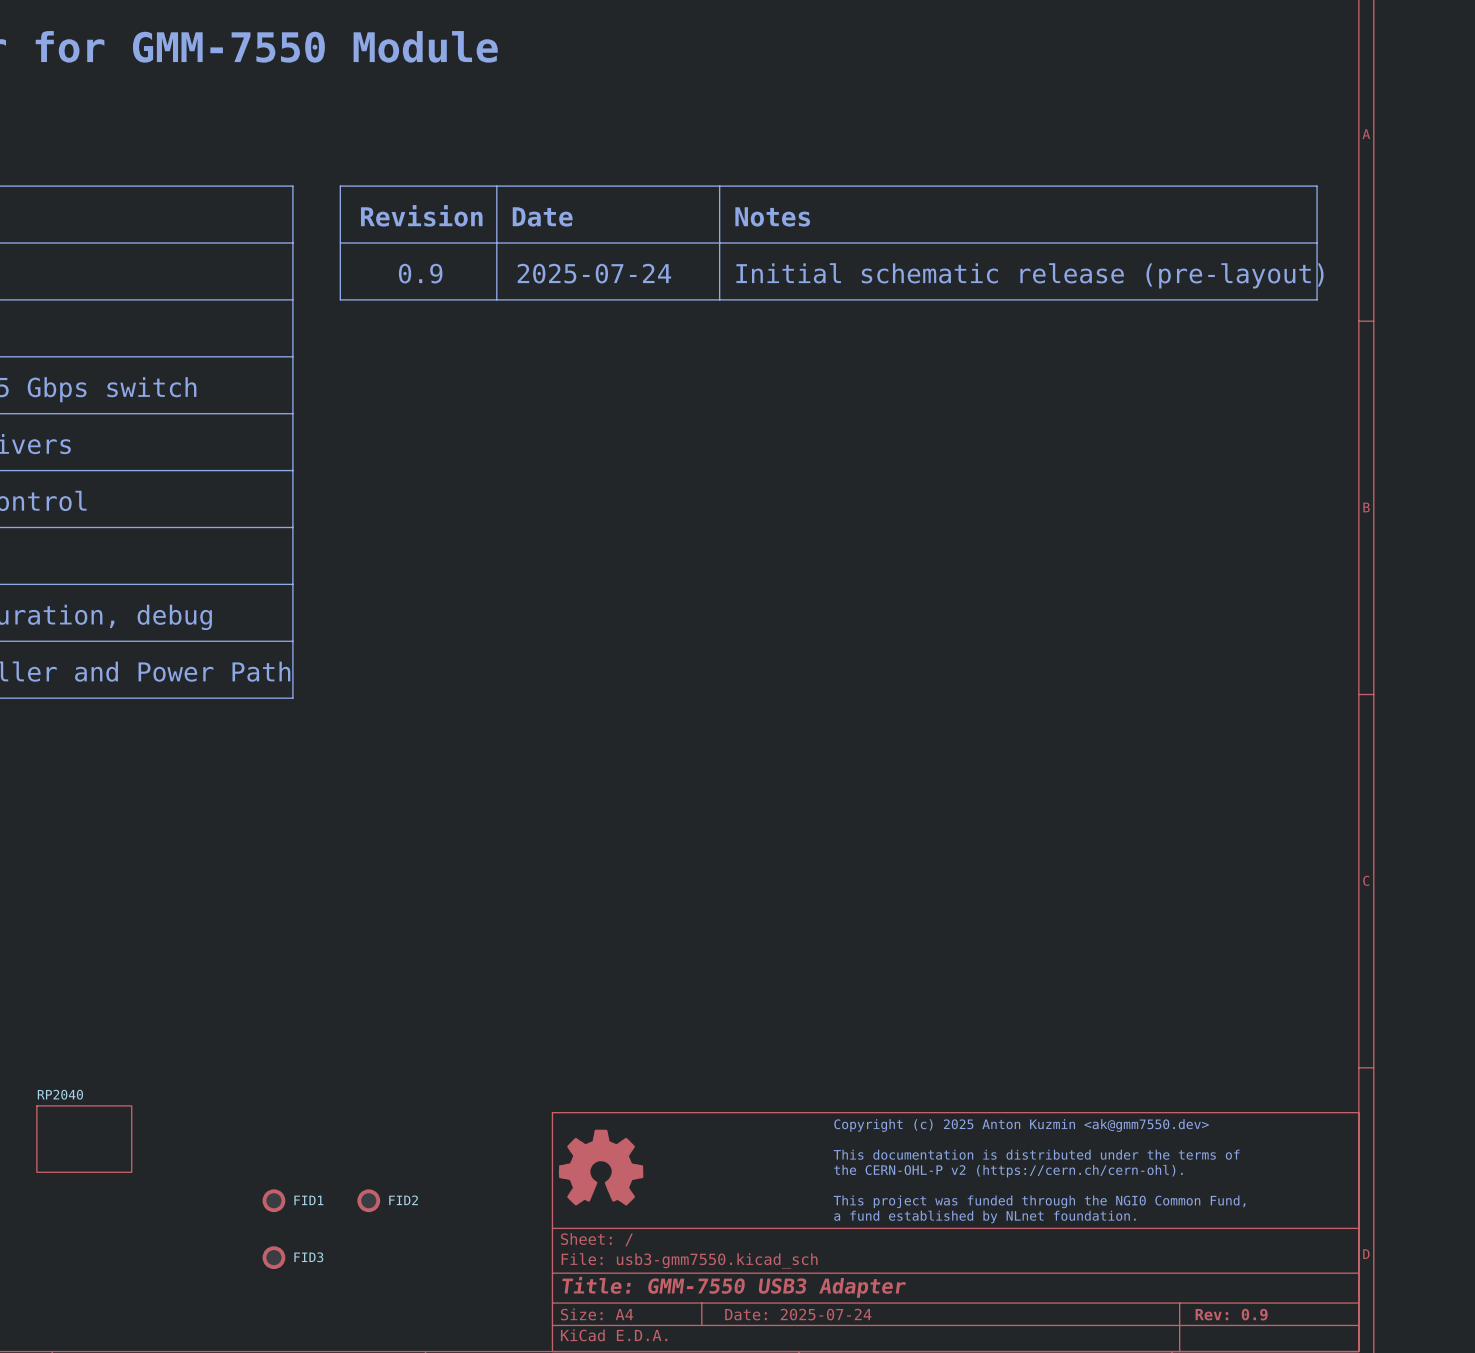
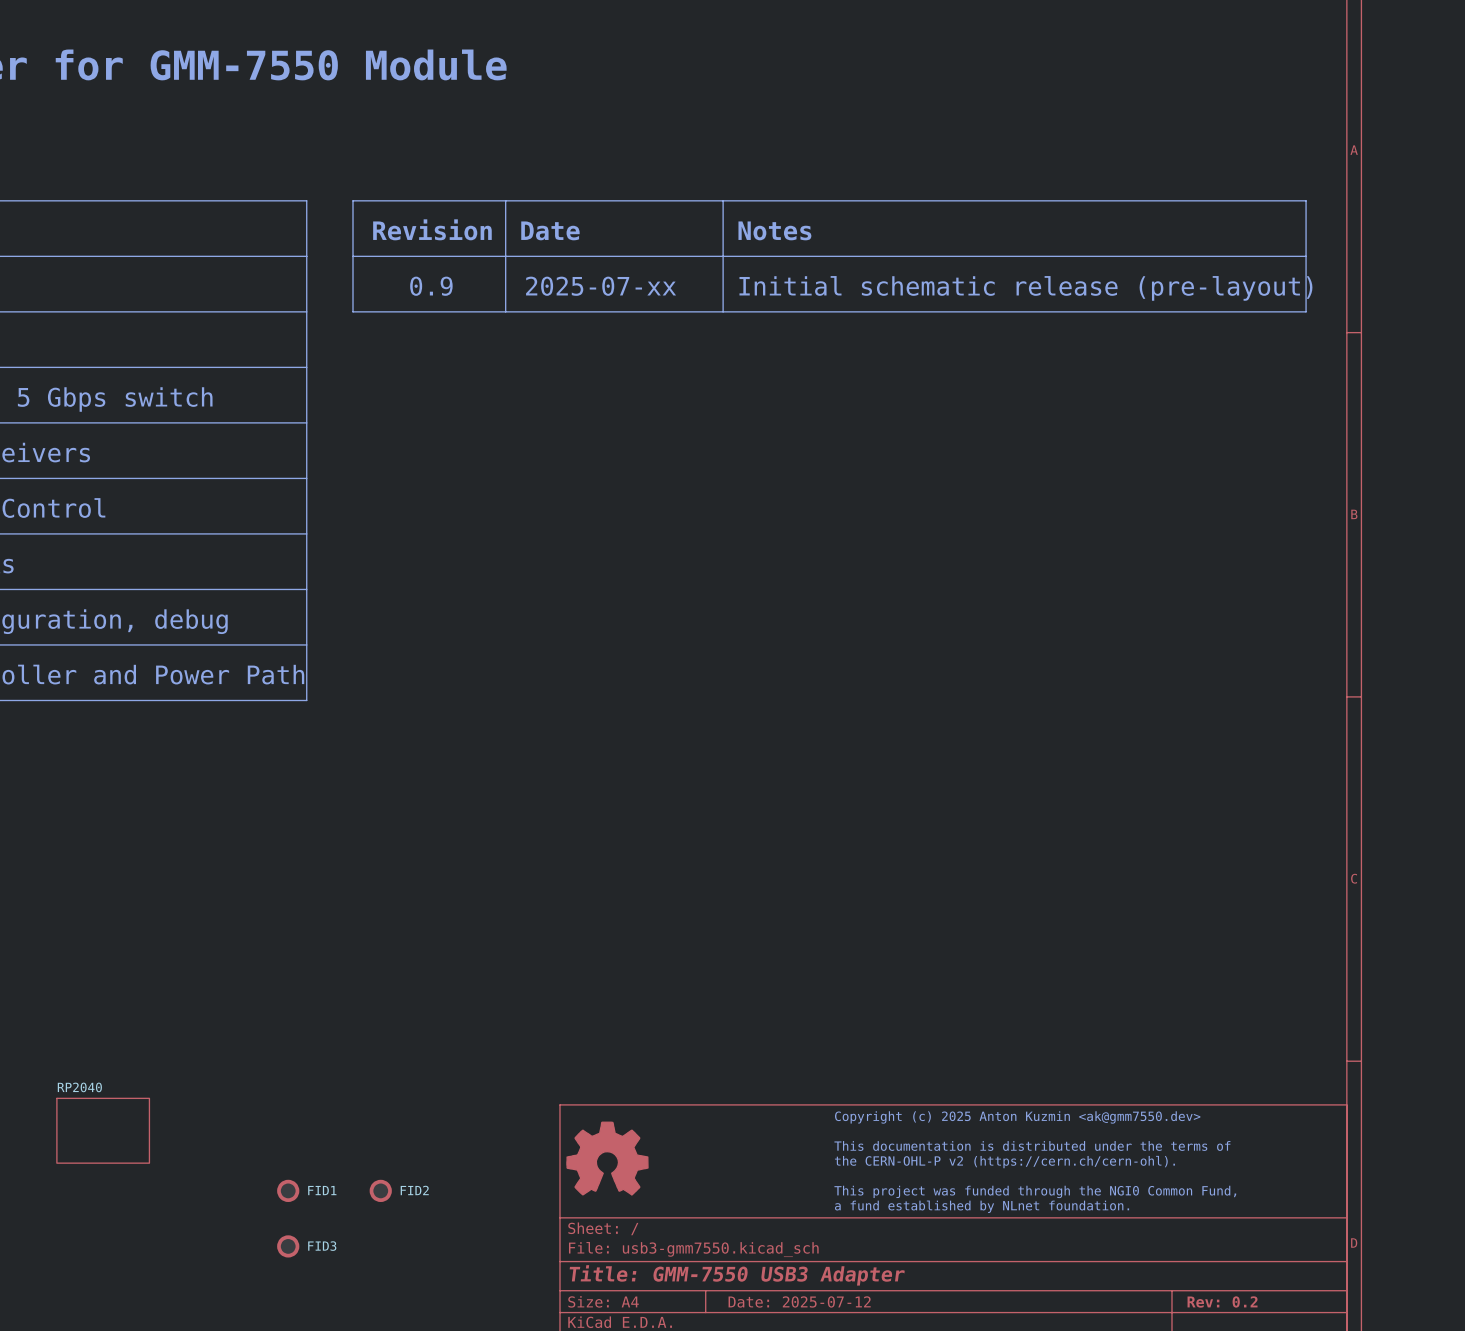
text: 2025-07-24 (594, 273) -> 2025-07-xx (601, 286)
title block: Date: 2025-07-24 (798, 1314) -> Date: 2025-07-12 (799, 1301)
title block: Rev: 0.9 (1231, 1314) -> Rev: 0.2 (1222, 1301)

